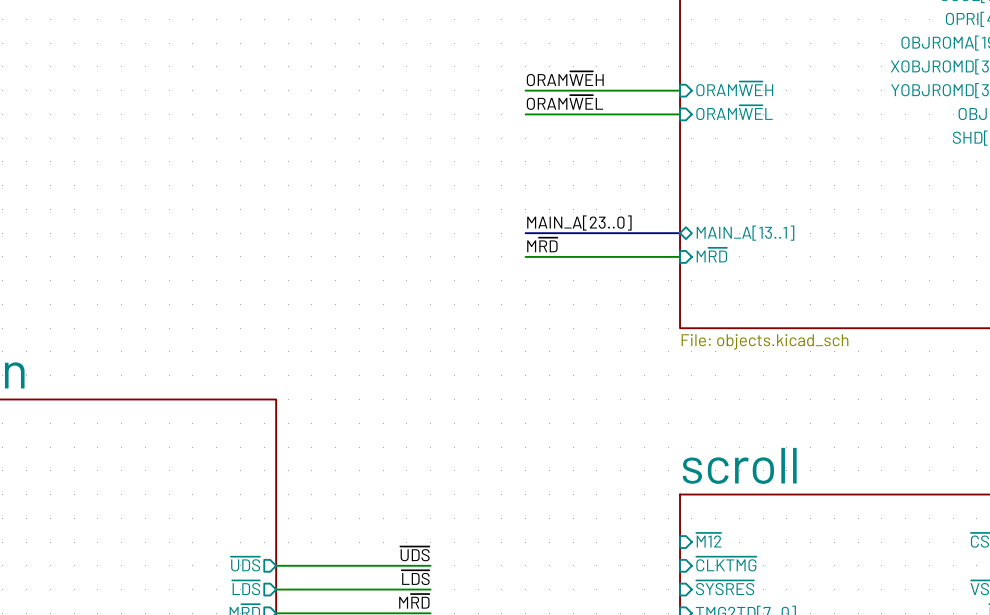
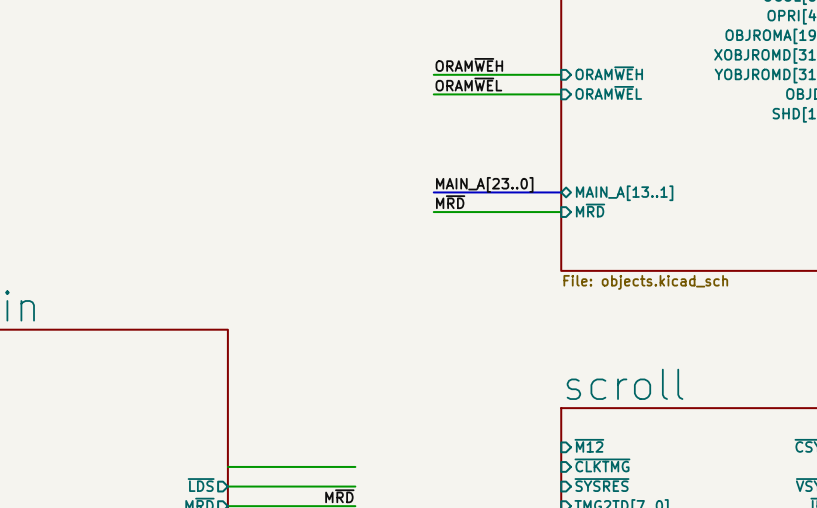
label: ~{UDS} (415, 553) -> none
sheet pin: ~{UDS} (245, 564) -> none
label: ~{LDS} (415, 577) -> none

